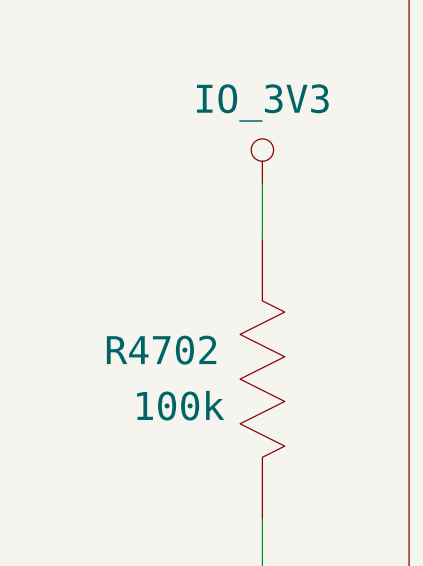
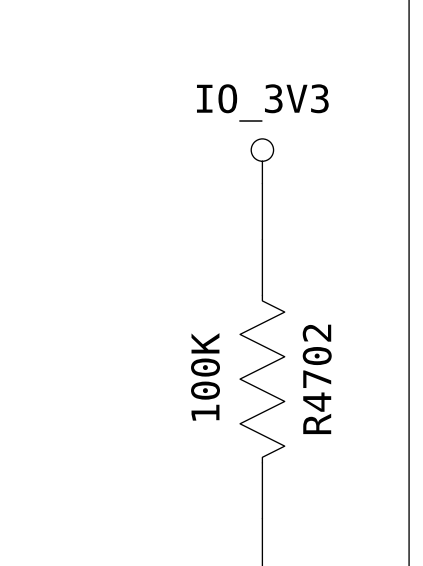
R4702 name rotation: 0° (161, 350) -> 90° counterclockwise (317, 379)
R4702 name position: R4702 (161, 350) -> R4702 (317, 379)
R4702 value: 100k (180, 405) -> 100K (205, 376)

